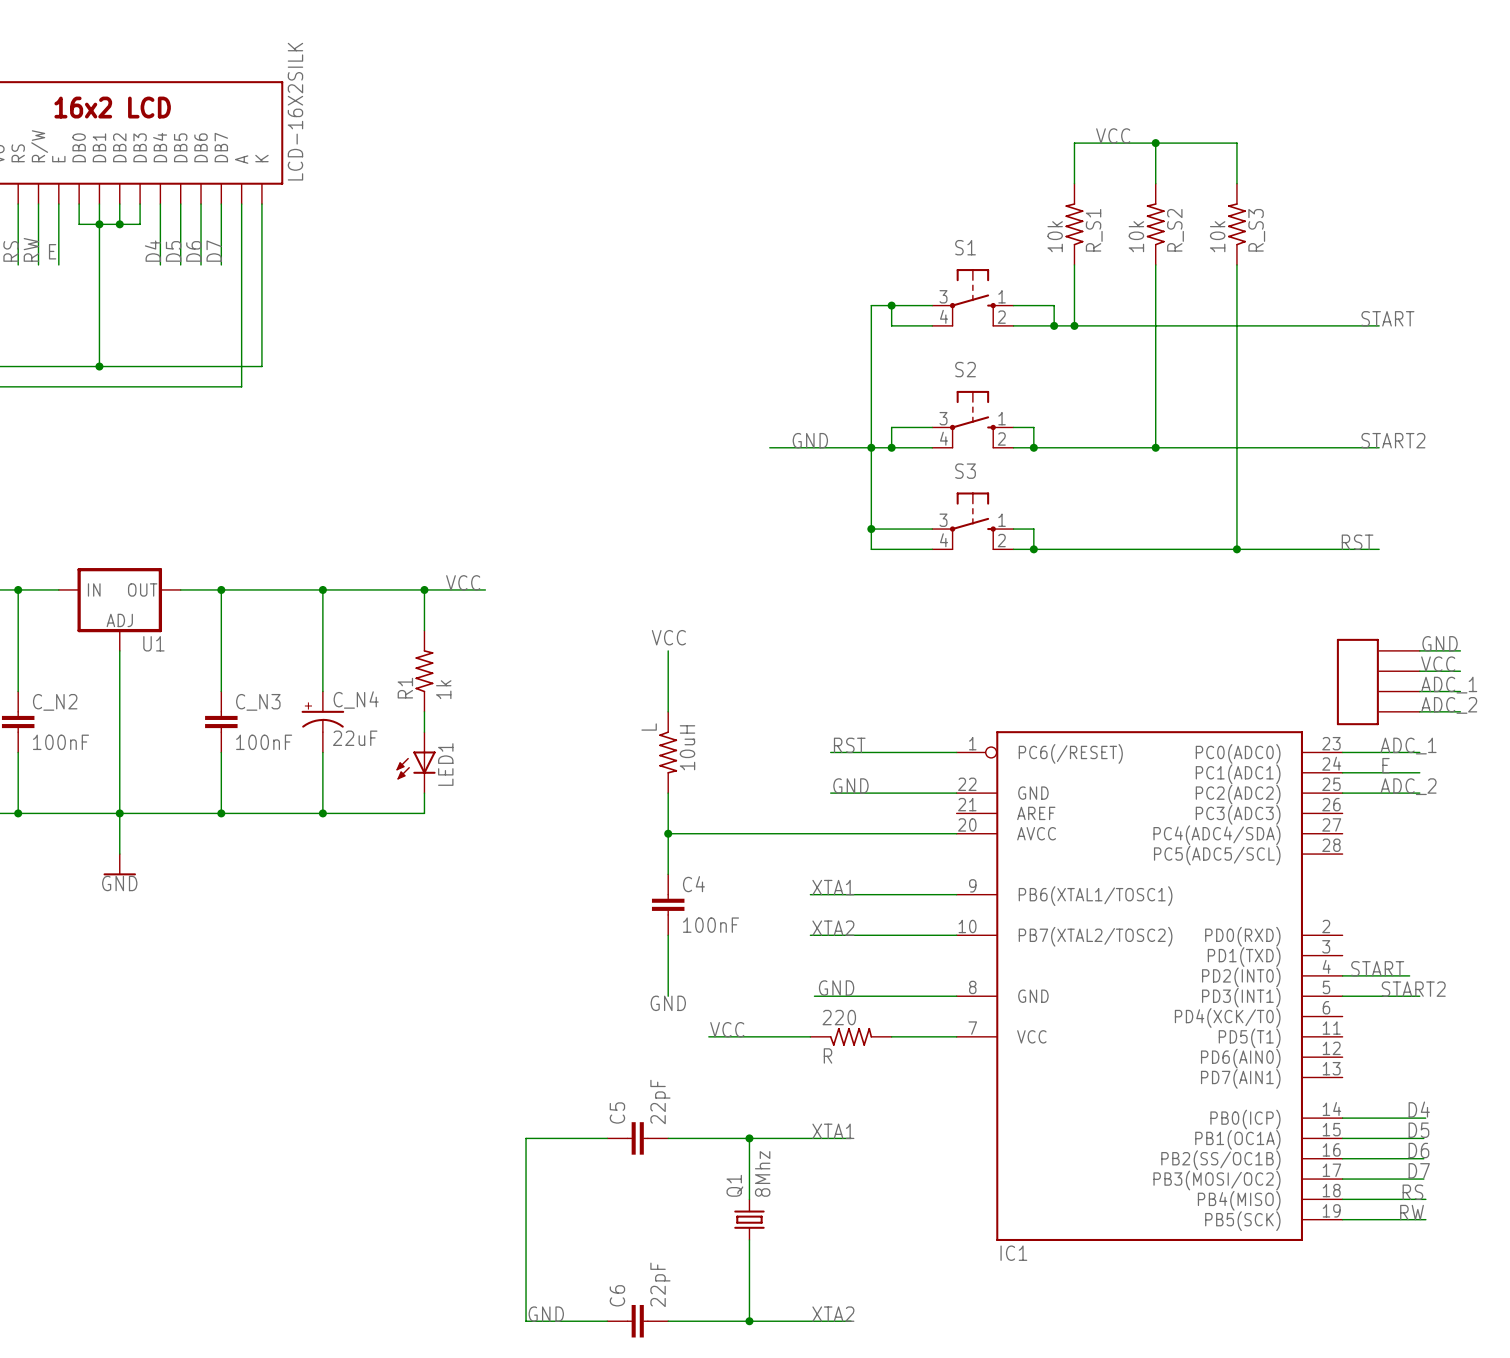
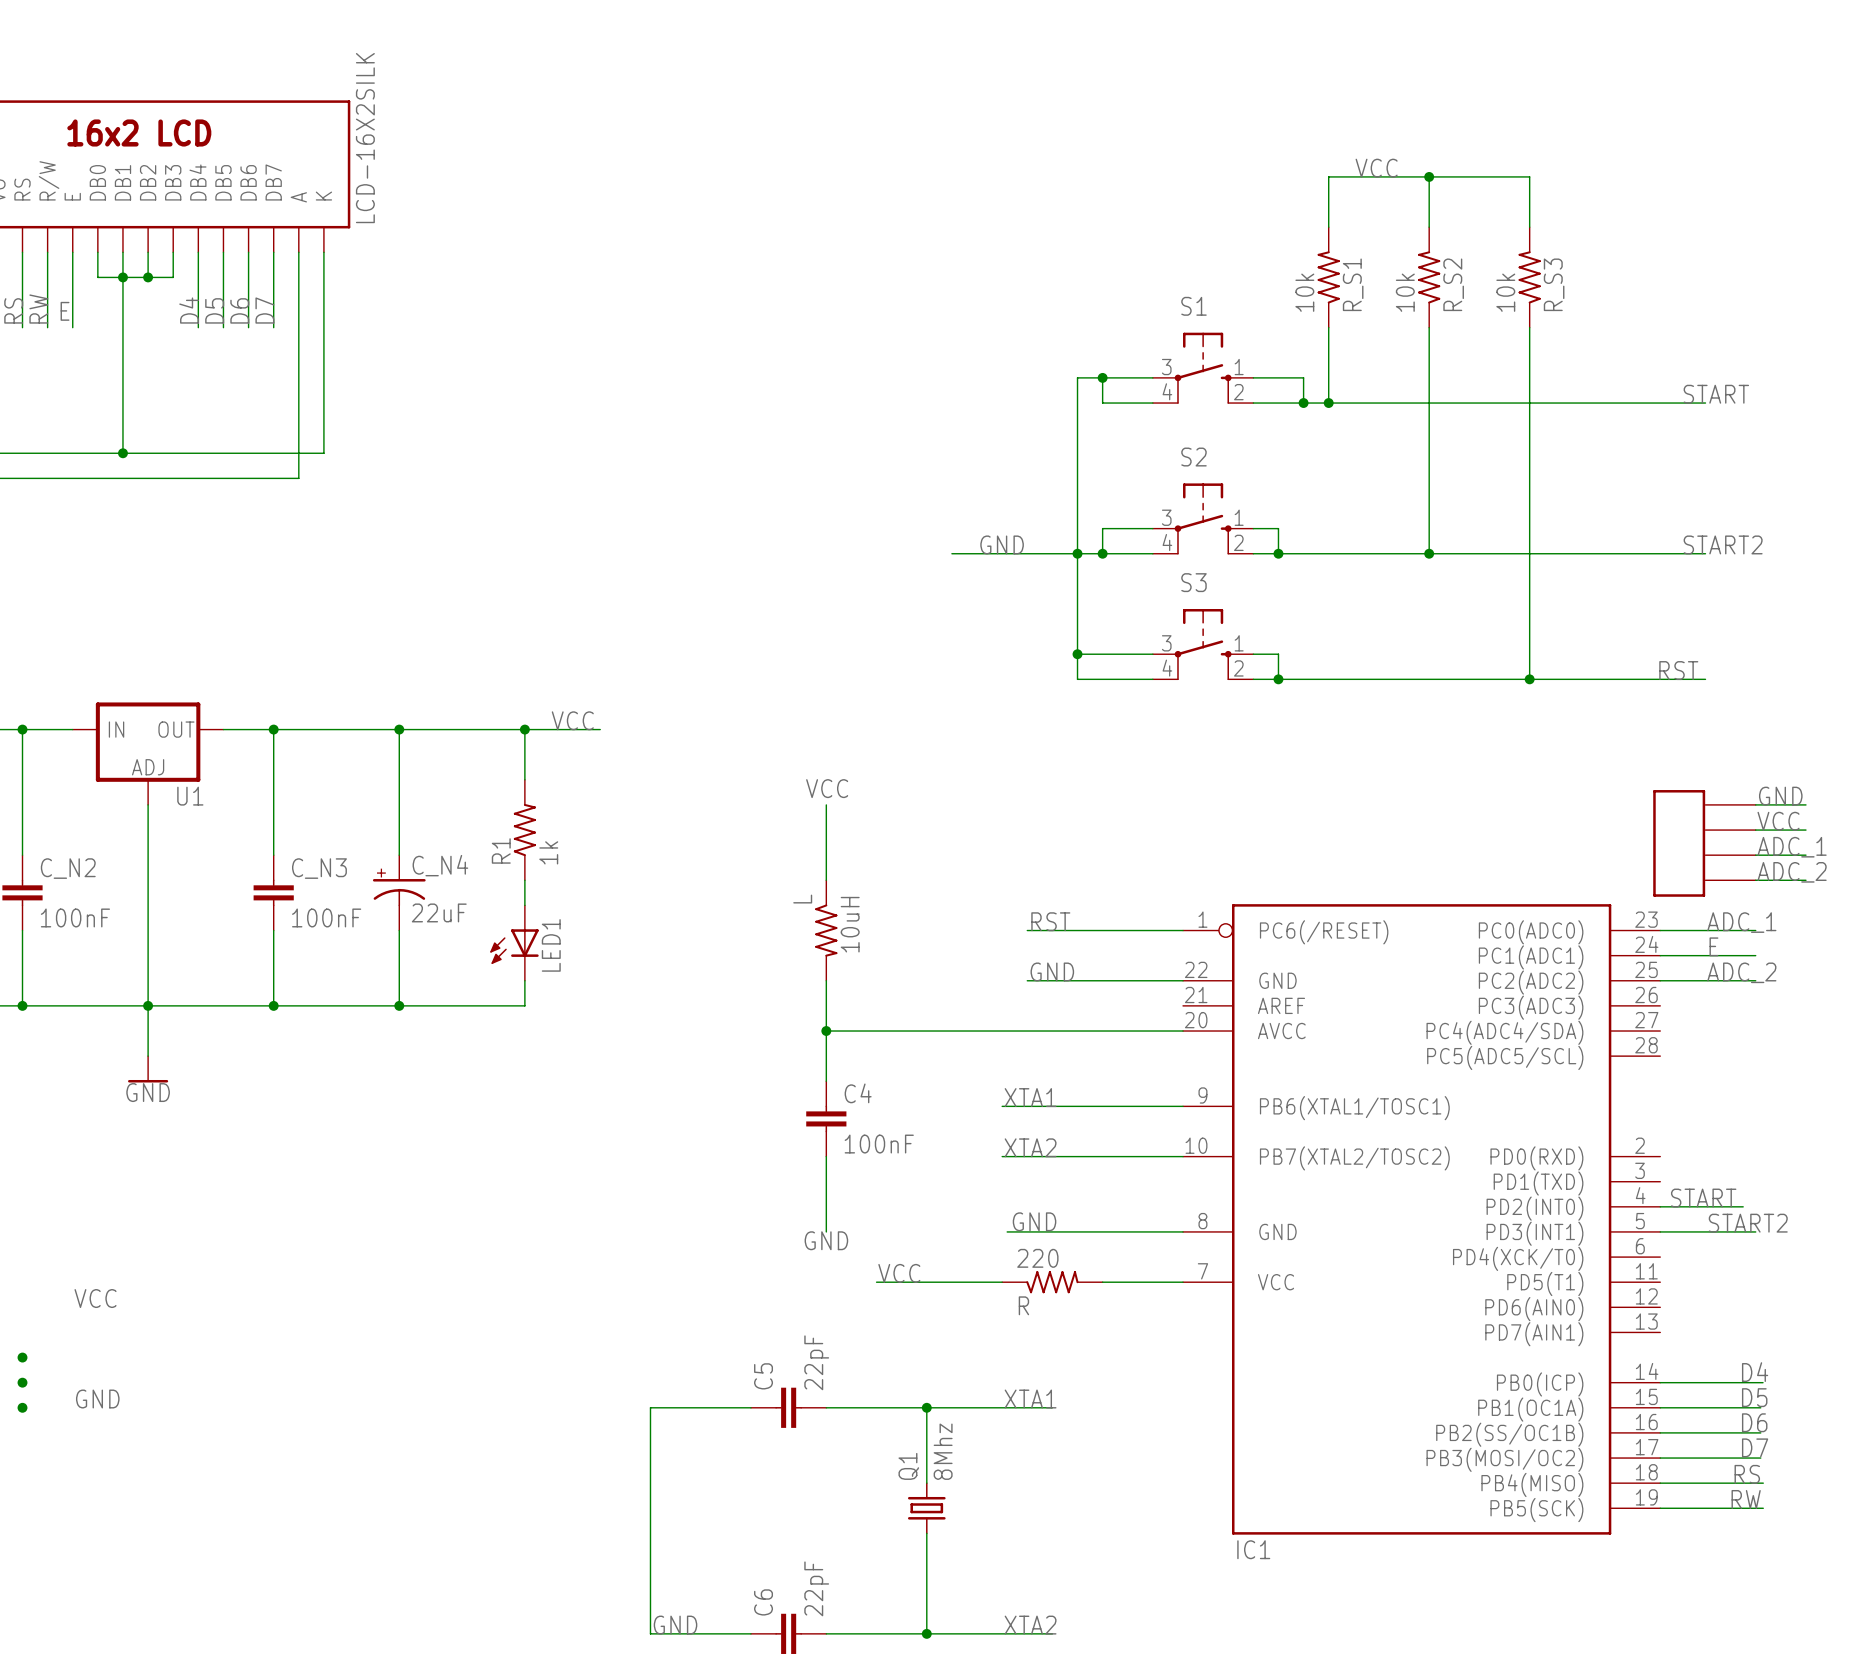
label: none -> VCC (95, 1298)
junction: none -> (22, 1357)
junction: none -> (22, 1382)
label: none -> GND (97, 1399)
junction: none -> (22, 1407)

